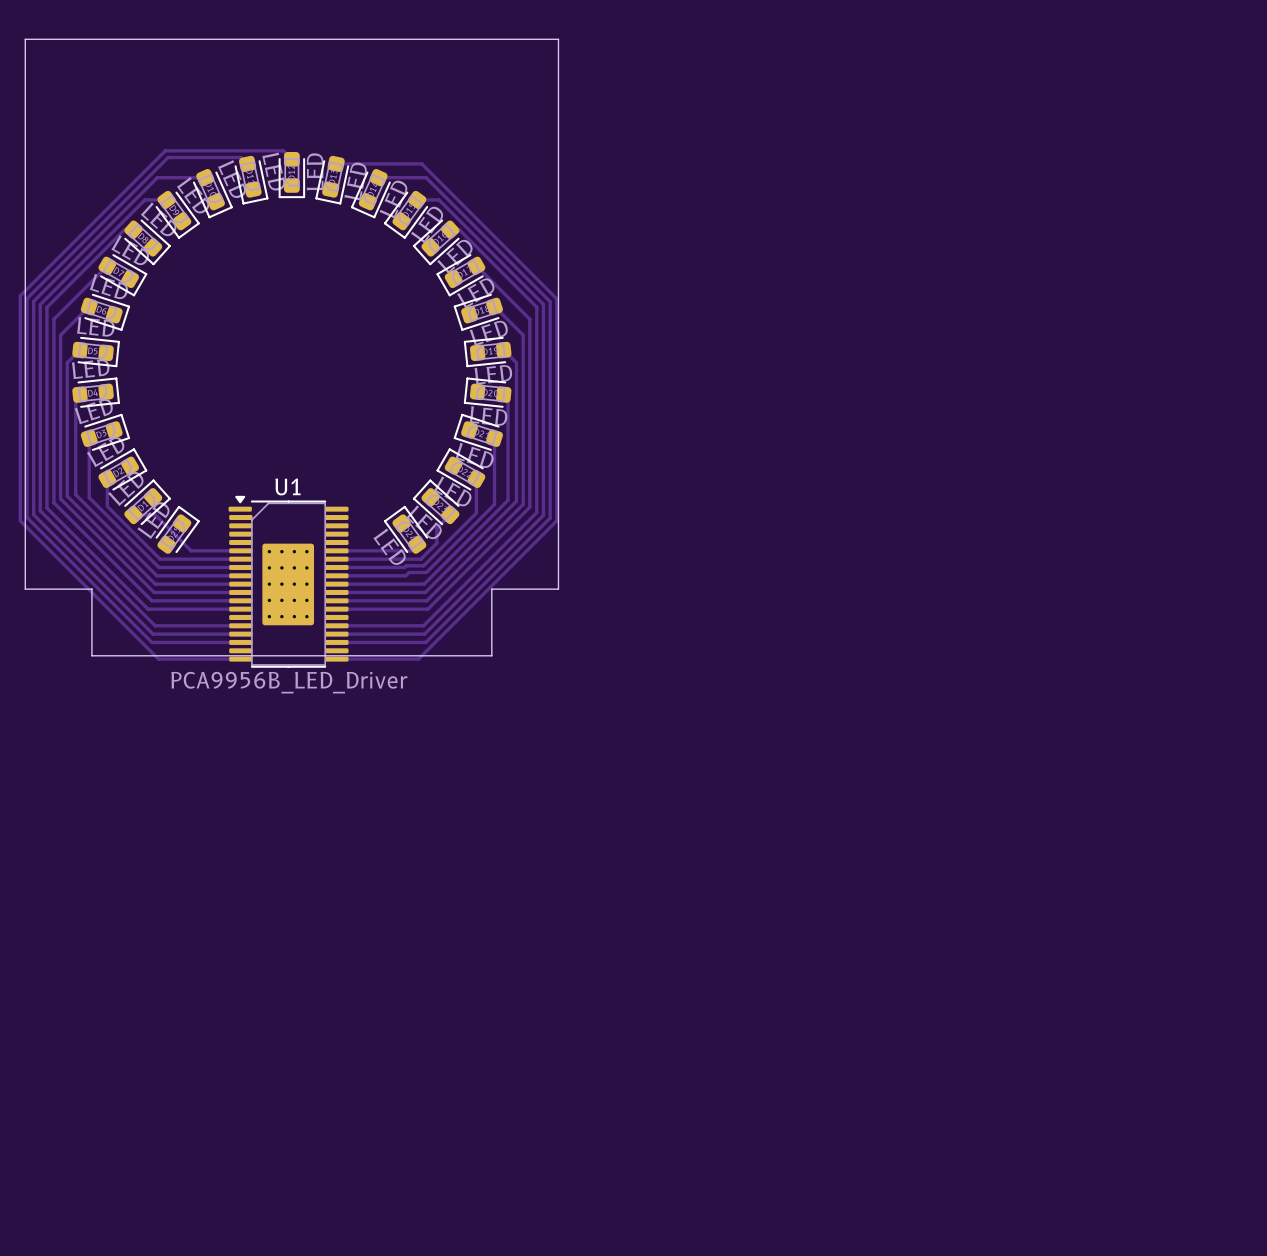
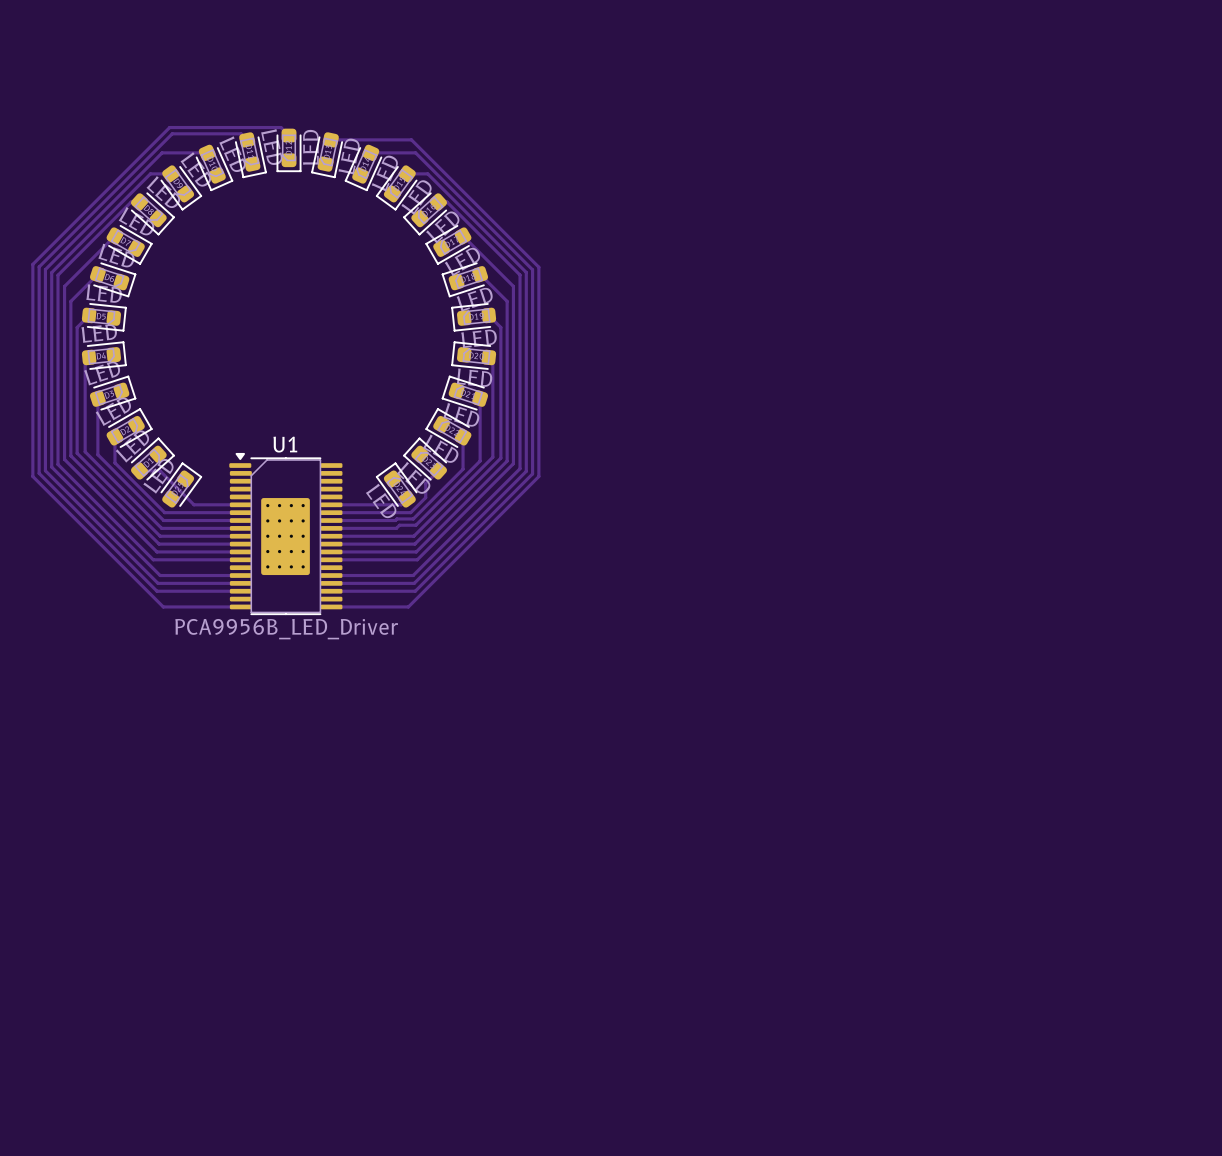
board edge: (25, 39) (558, 39) (558, 589) (491, 589) (491, 655) (91, 655) (91, 589) (25, 589) (25, 39) -> none

